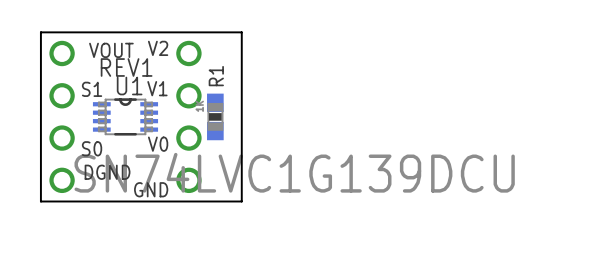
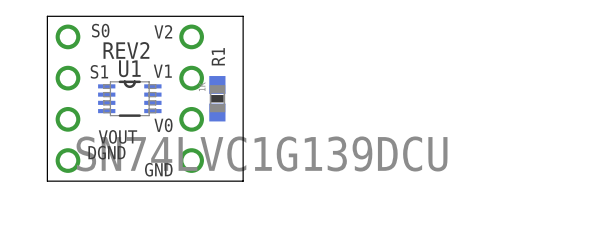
text position: VOUT (111, 50) -> VOUT (117, 136)
text: REV1 (126, 67) -> REV2 (126, 50)
text position: S0 (92, 148) -> S0 (100, 30)

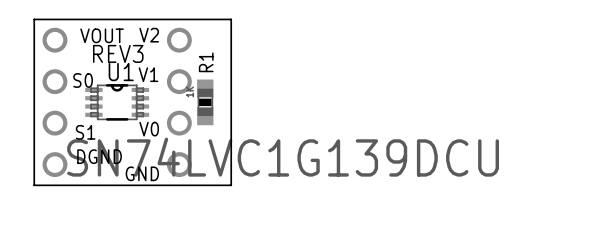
text position: S0 (100, 30) -> S0 (83, 80)
text: REV2 (126, 50) -> REV3 (118, 53)
text position: S1 (99, 71) -> S1 (85, 132)
text position: VOUT (117, 136) -> VOUT (102, 35)

